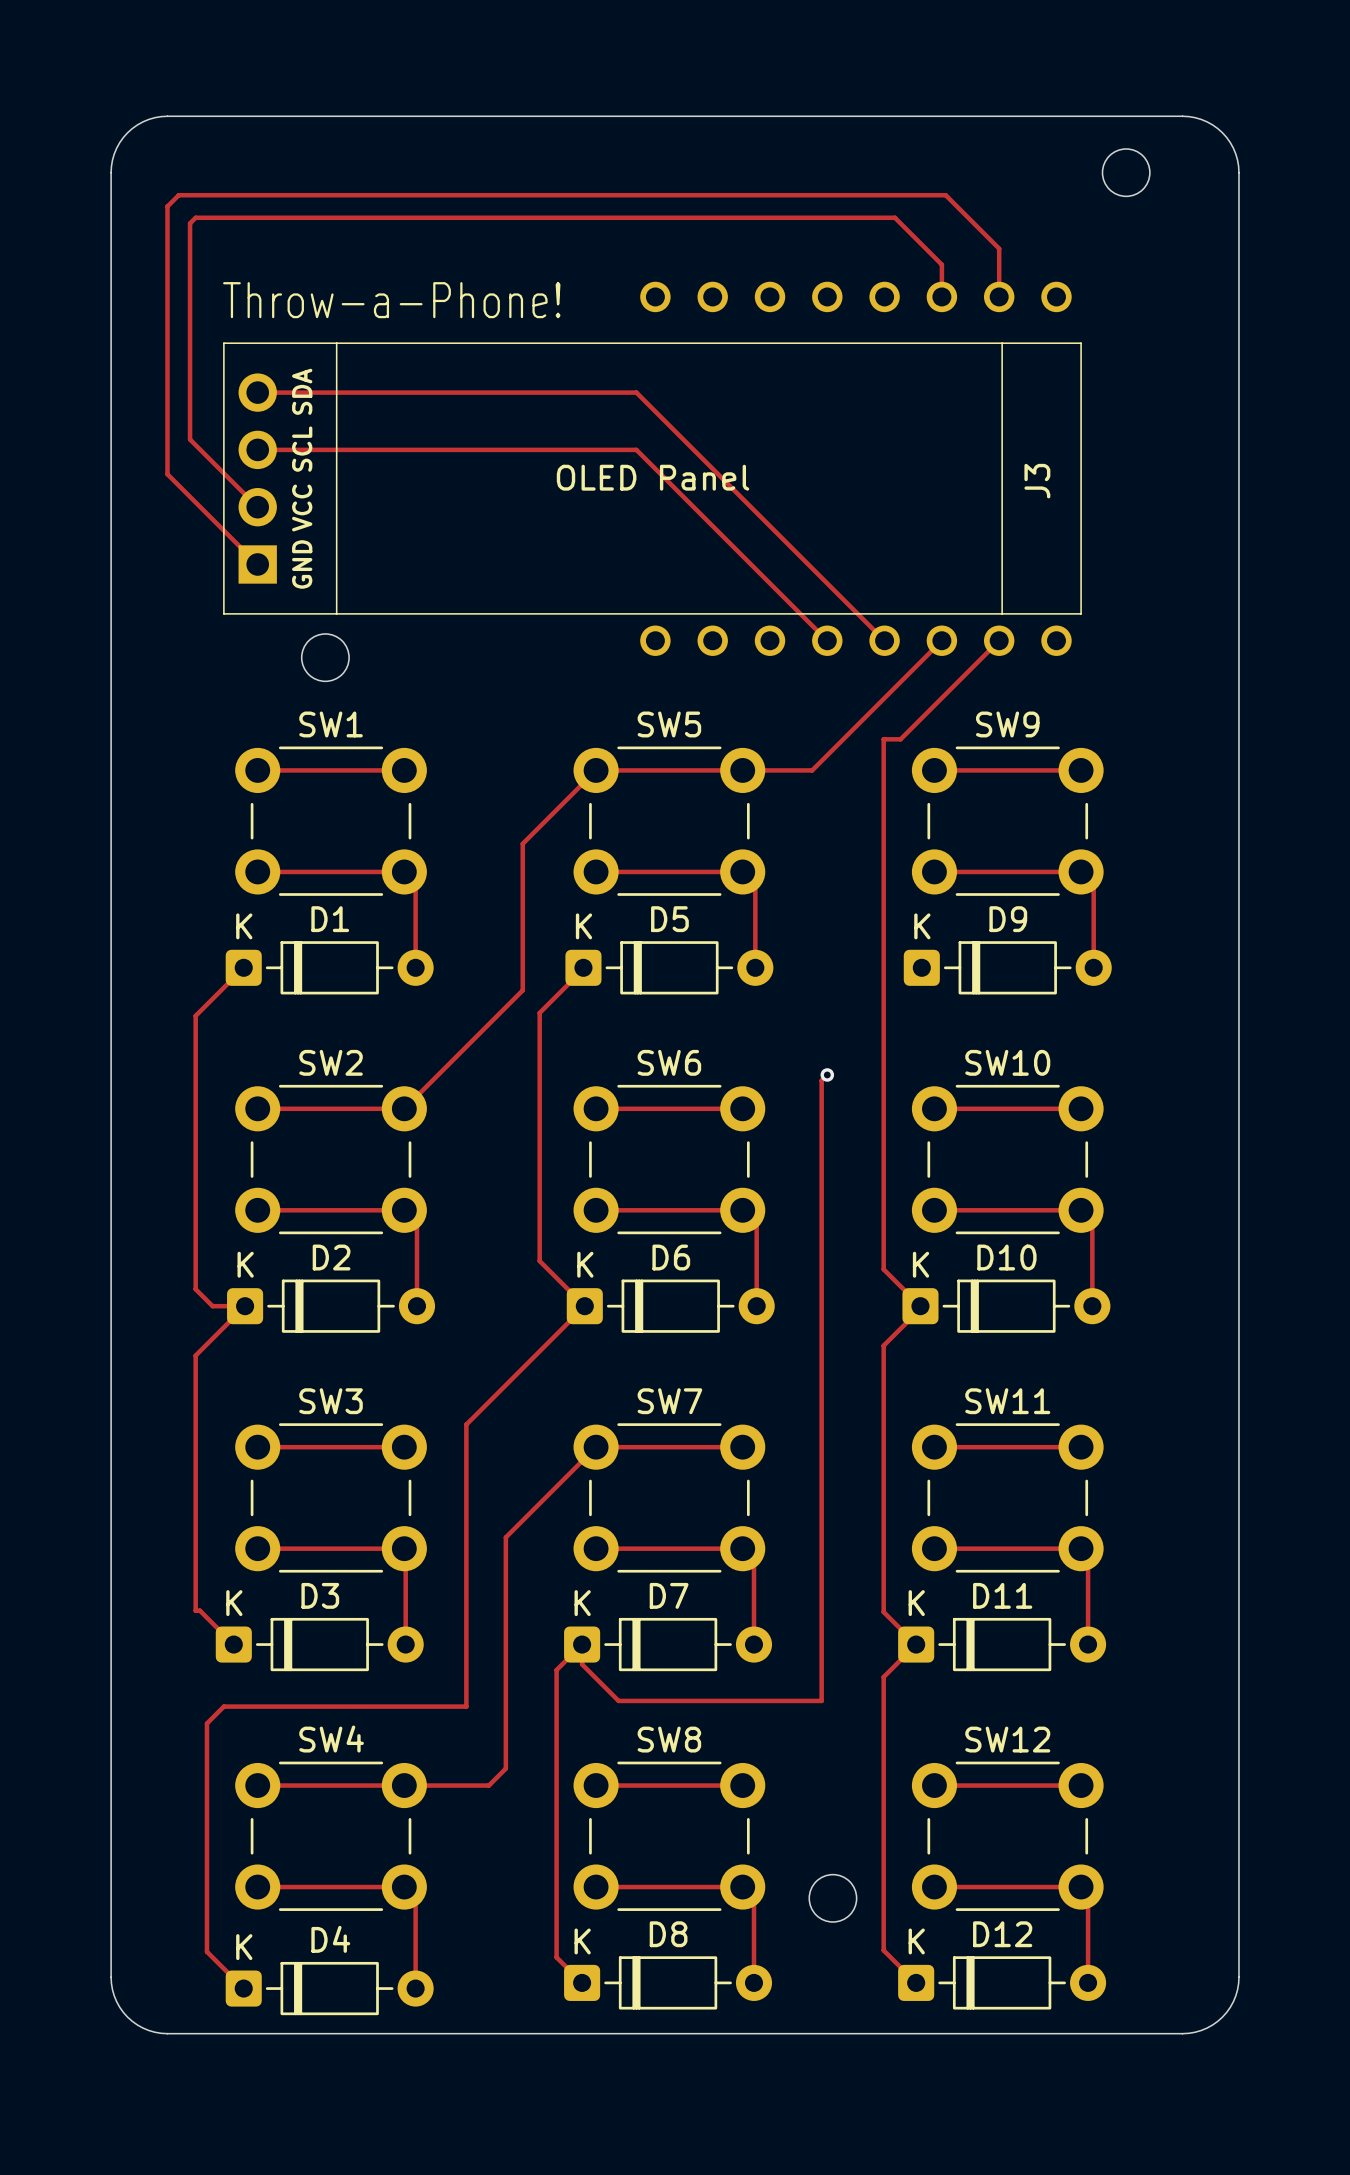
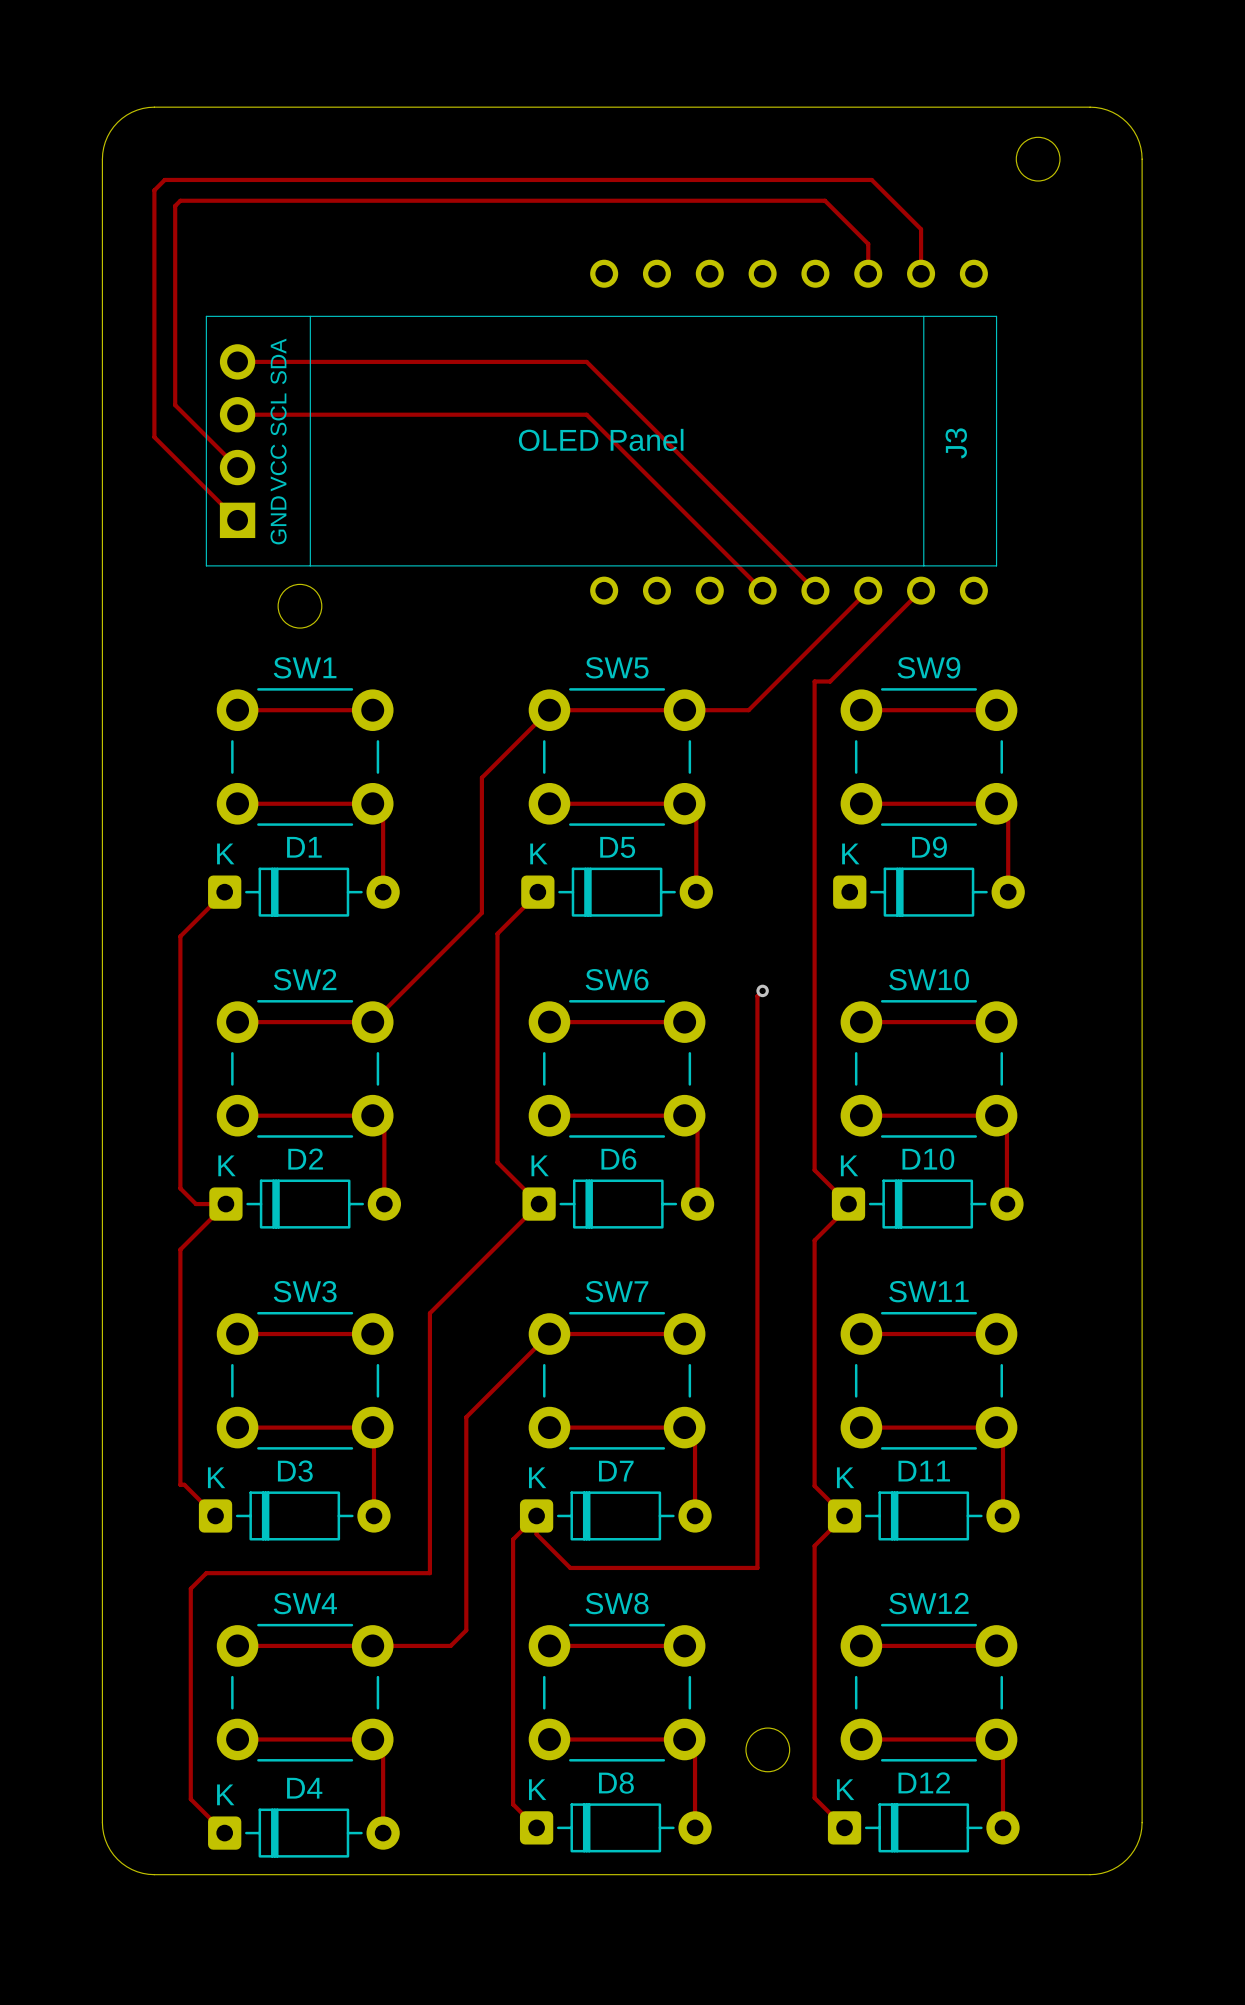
text: Throw-a-Phone! (391, 300) -> none

